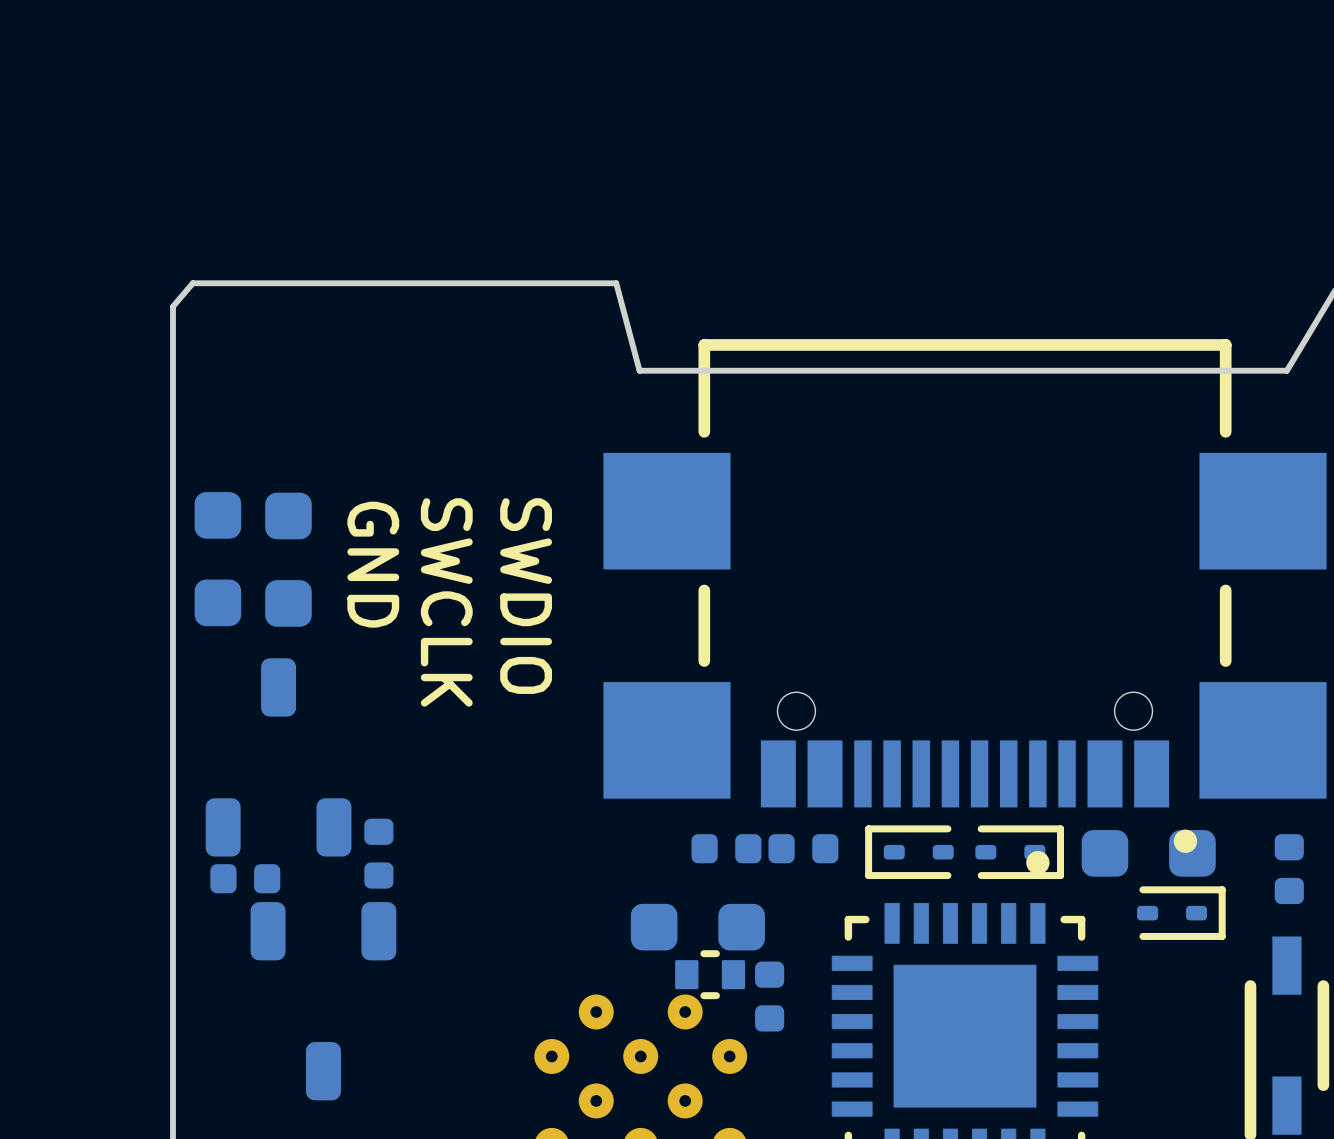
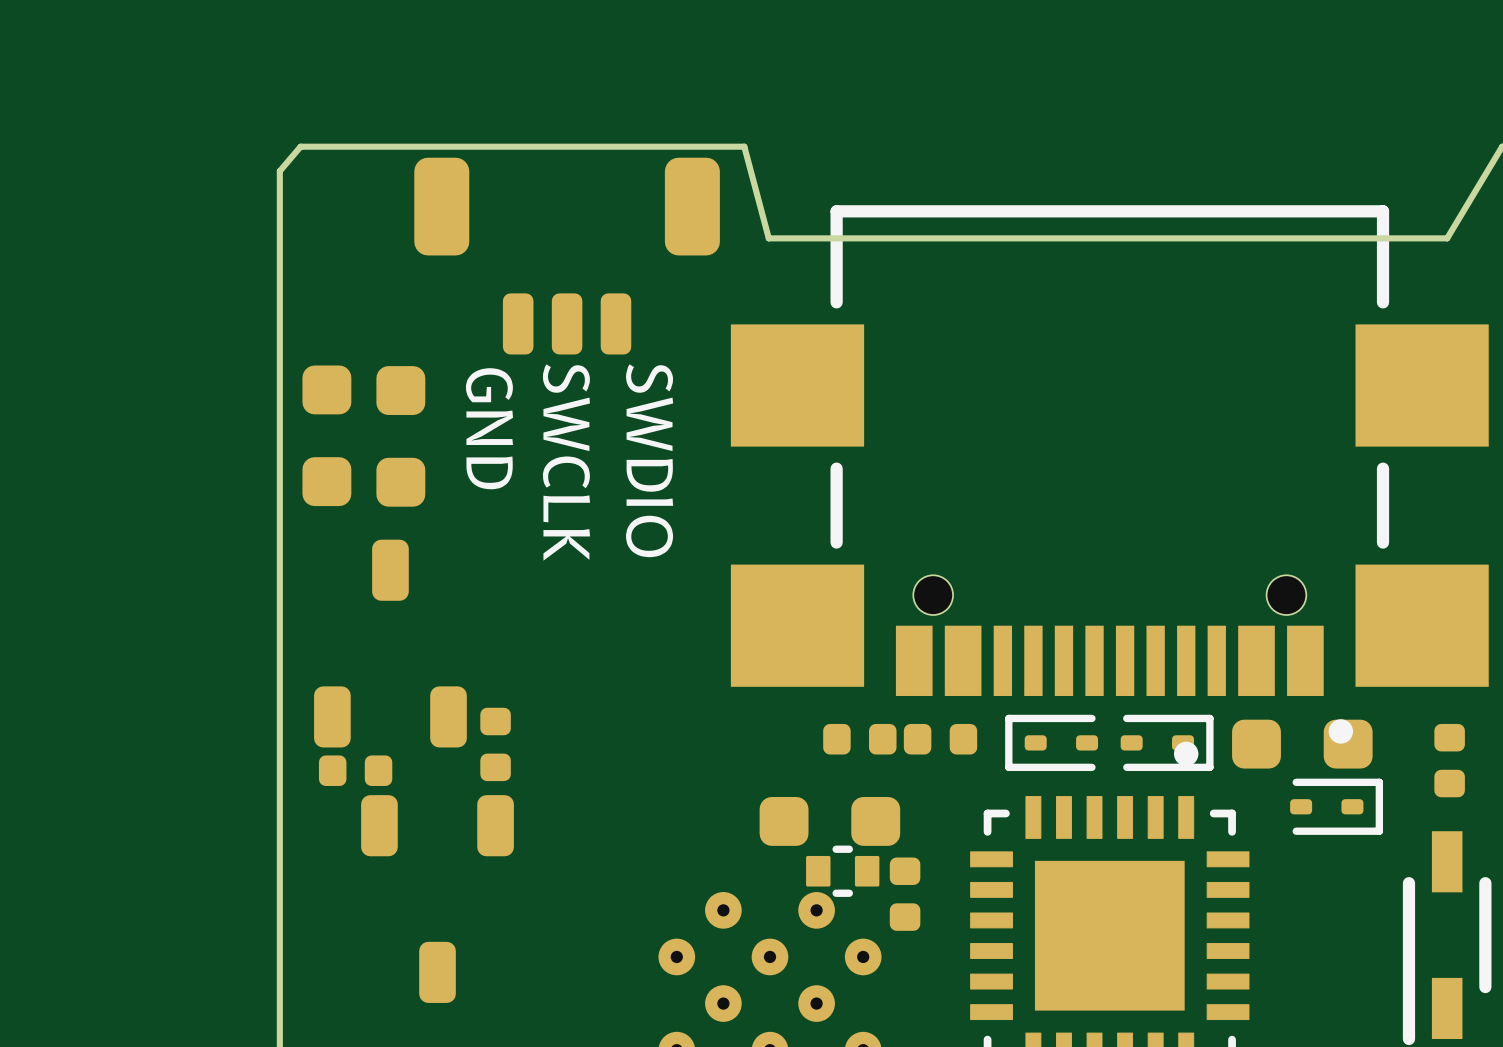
part: none -> (567, 256)

